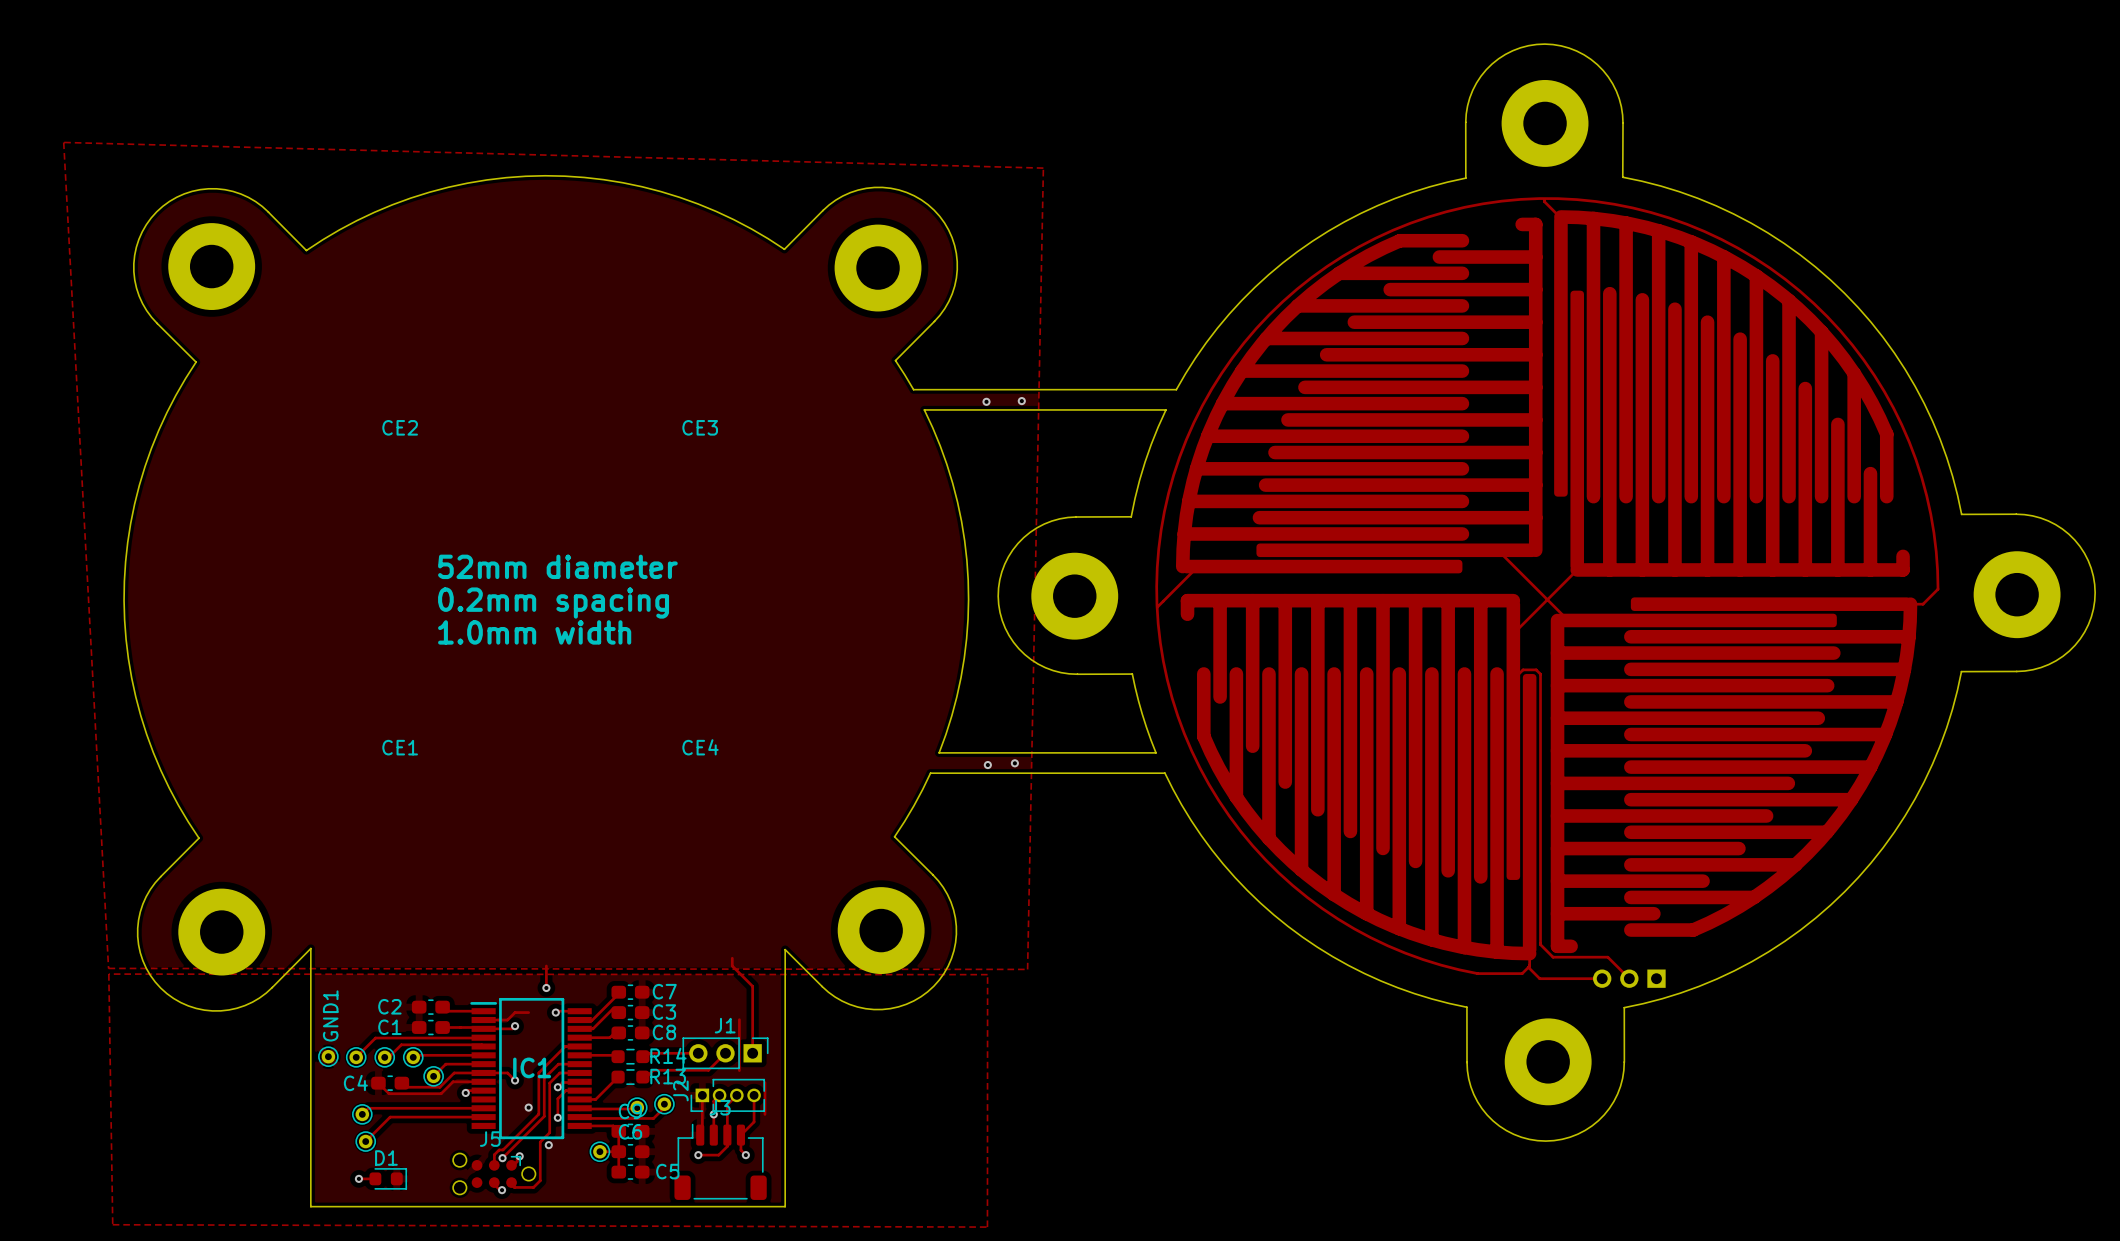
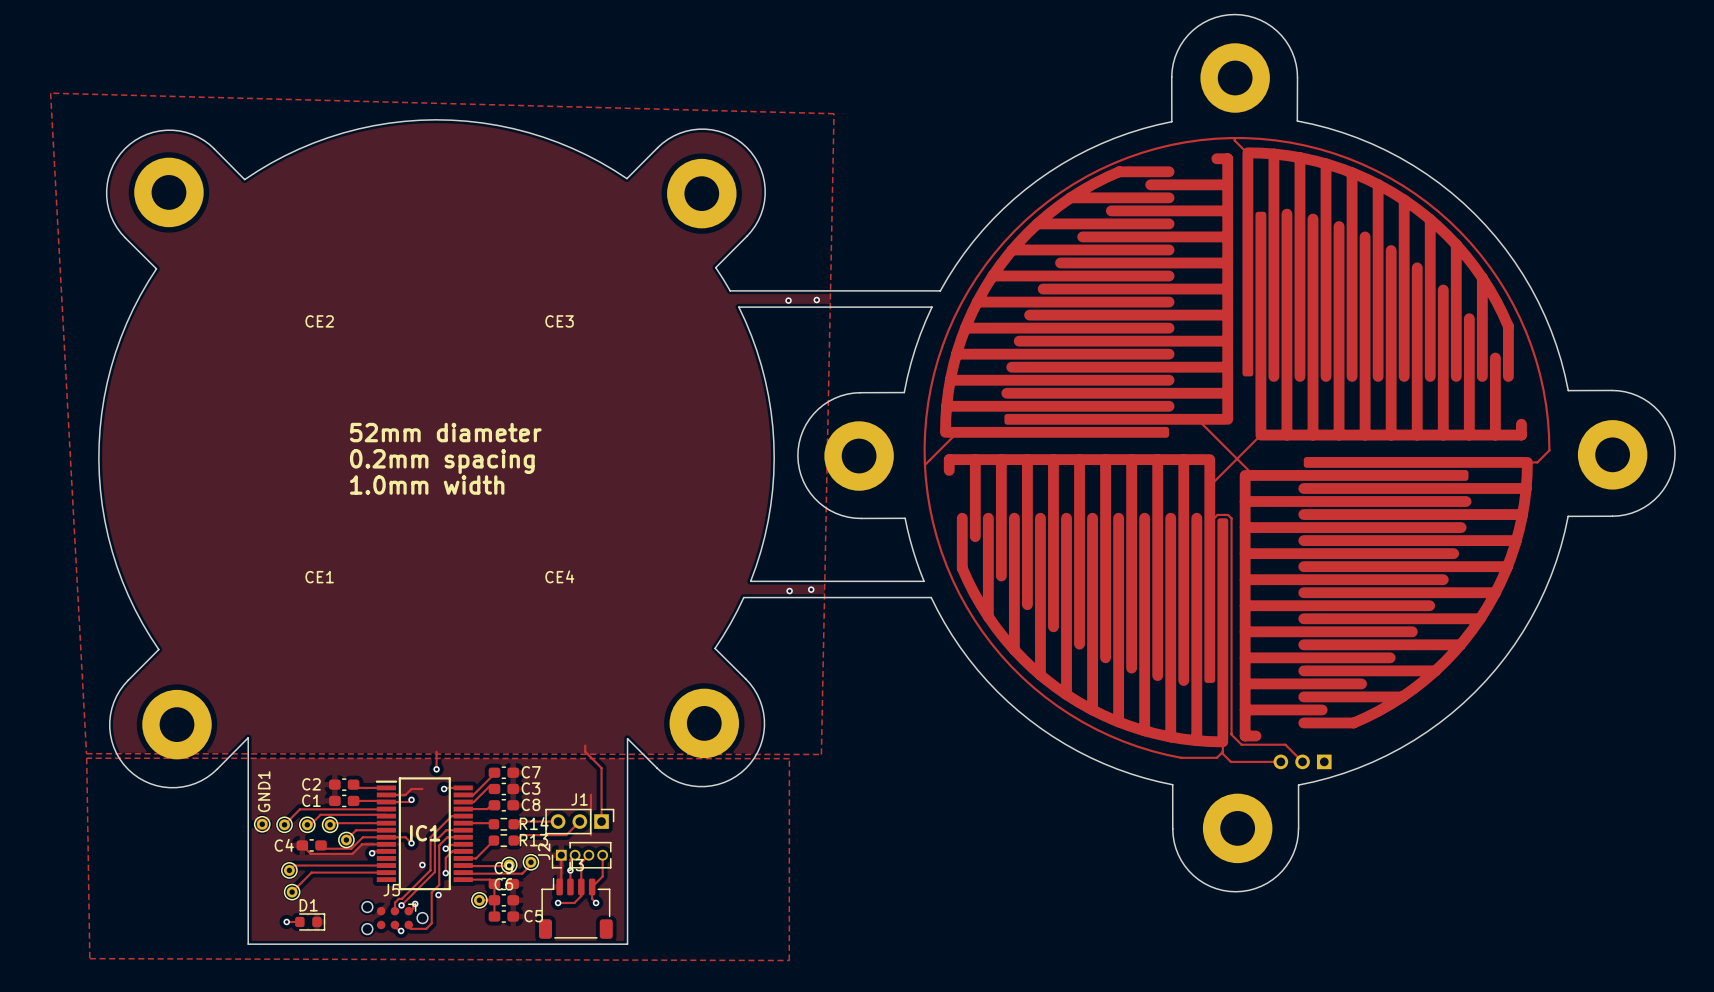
track: (764, 1082) (764, 1114) -> none

